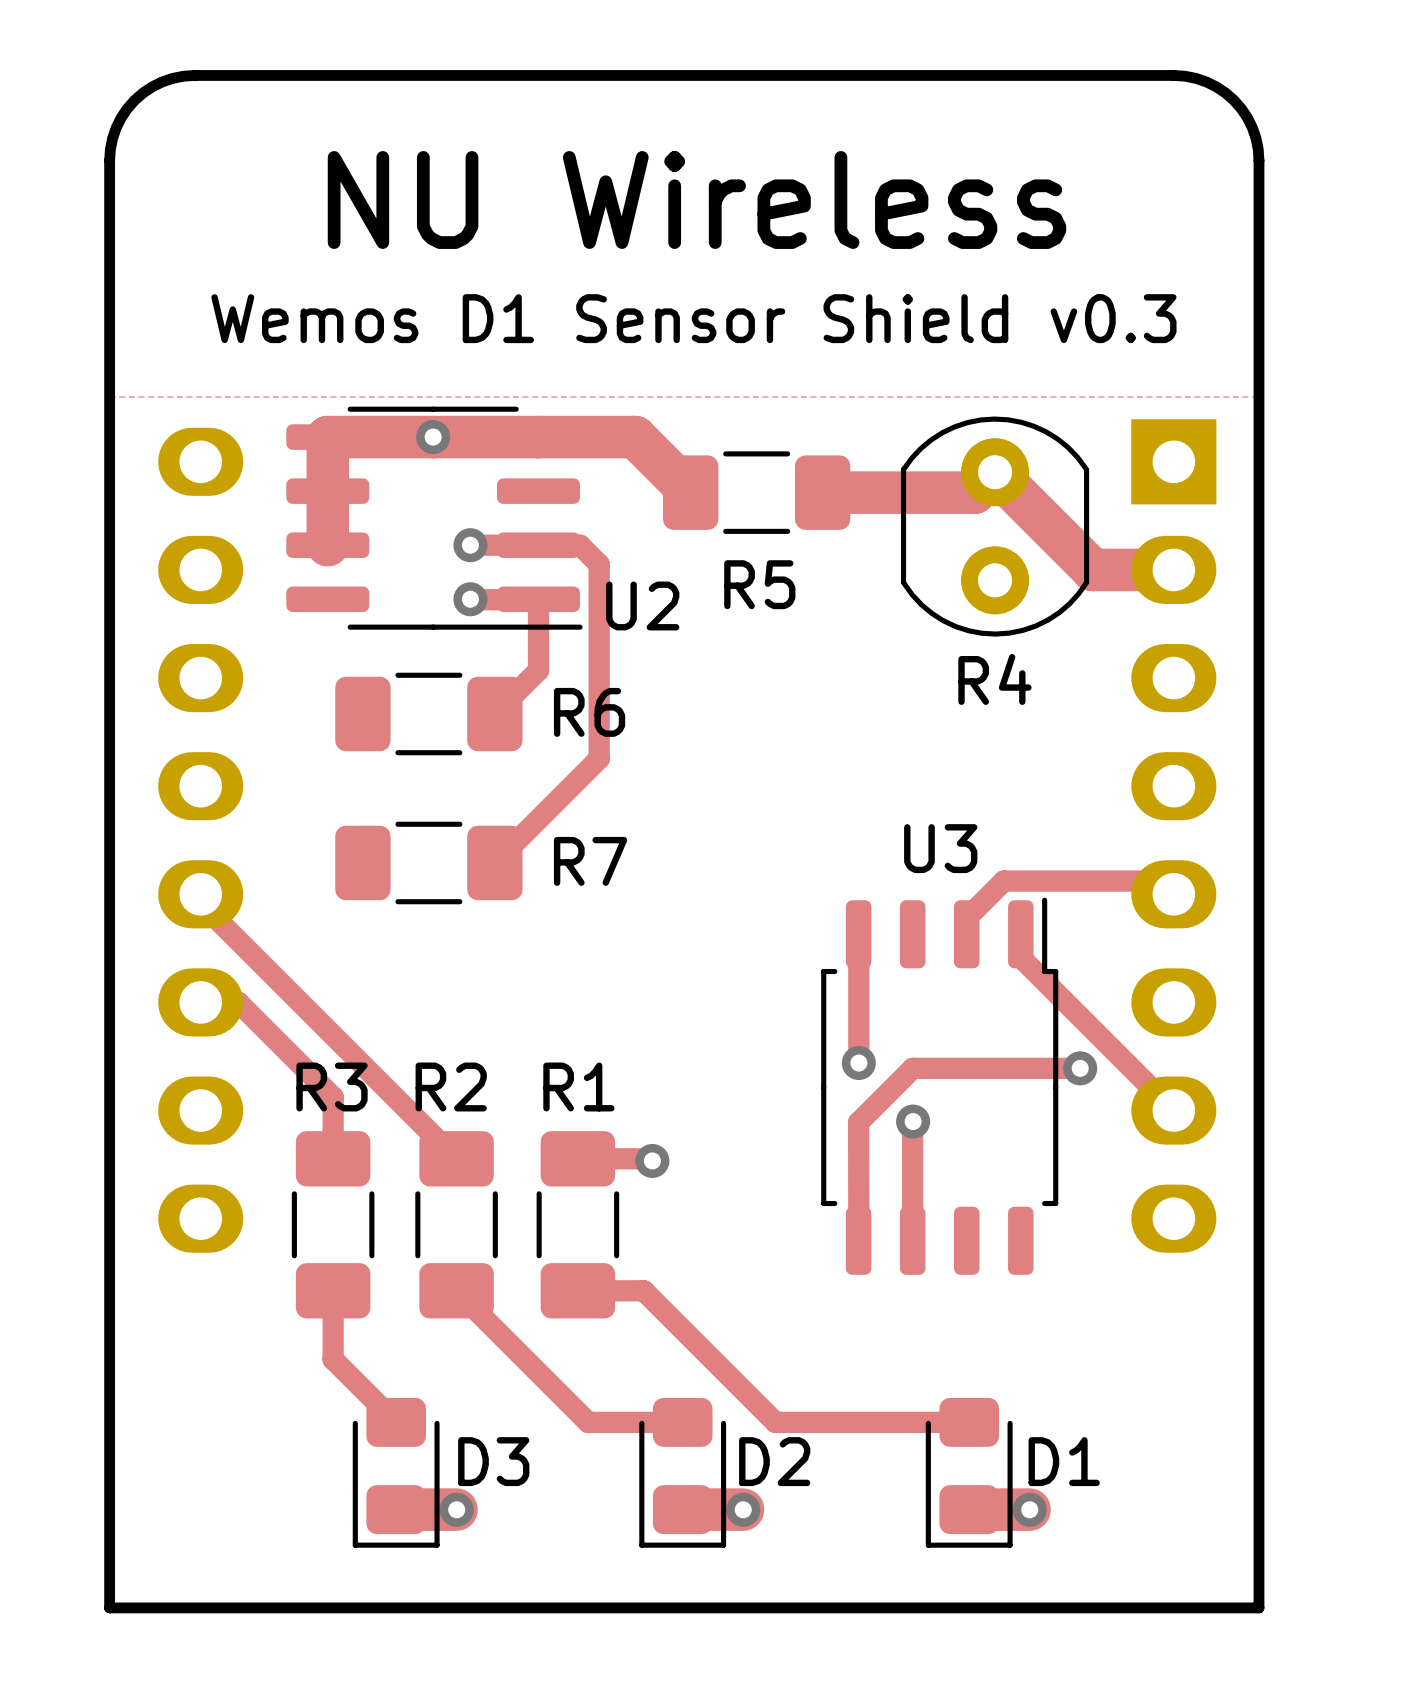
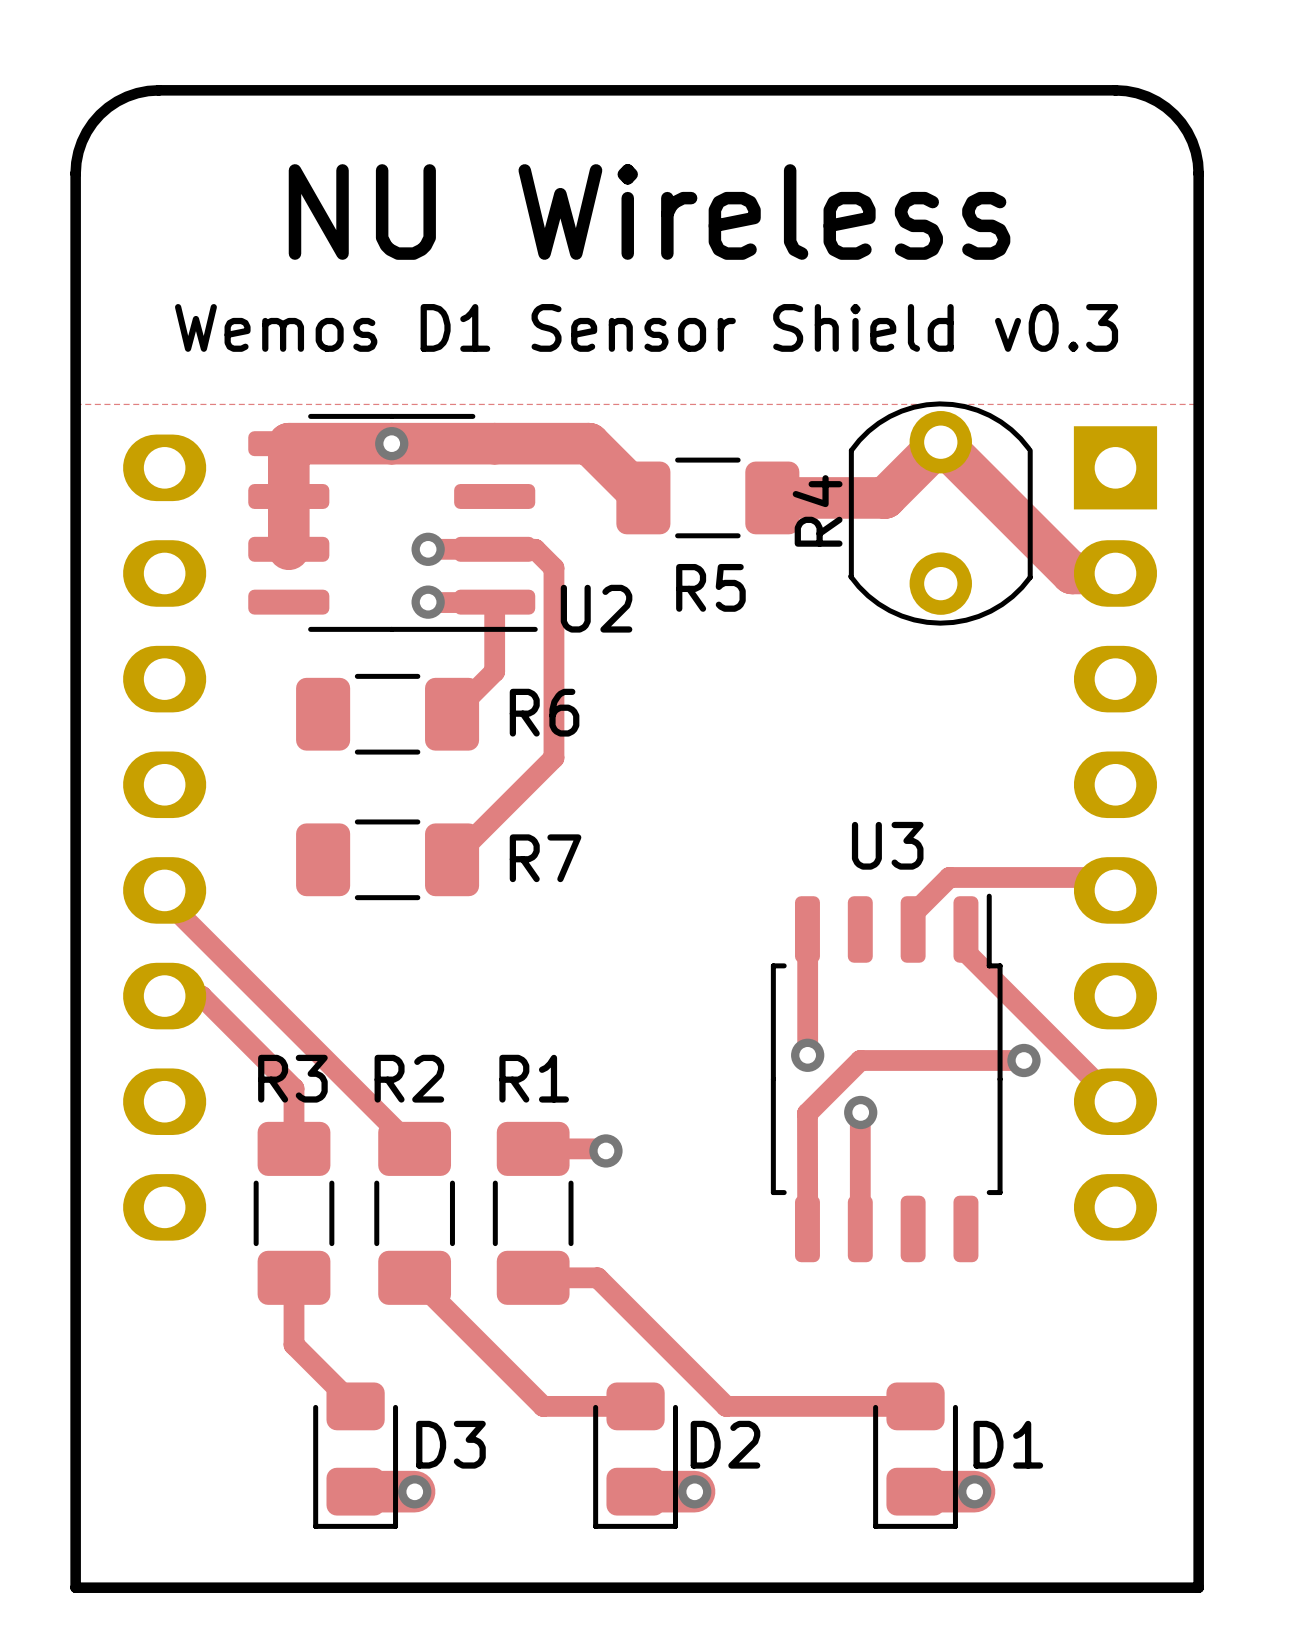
R4 footprint: [900, 416, 1090, 637] -> [848, 401, 1033, 626]
track: (938, 492) (974, 492) (995, 472) (1092, 569) (1129, 569) -> (885, 497) (940, 442) (1072, 573)
R4 name rotation: 0° (994, 679) -> 90° counterclockwise (817, 510)
R4 name position: R4 (994, 679) -> R4 (817, 510)

